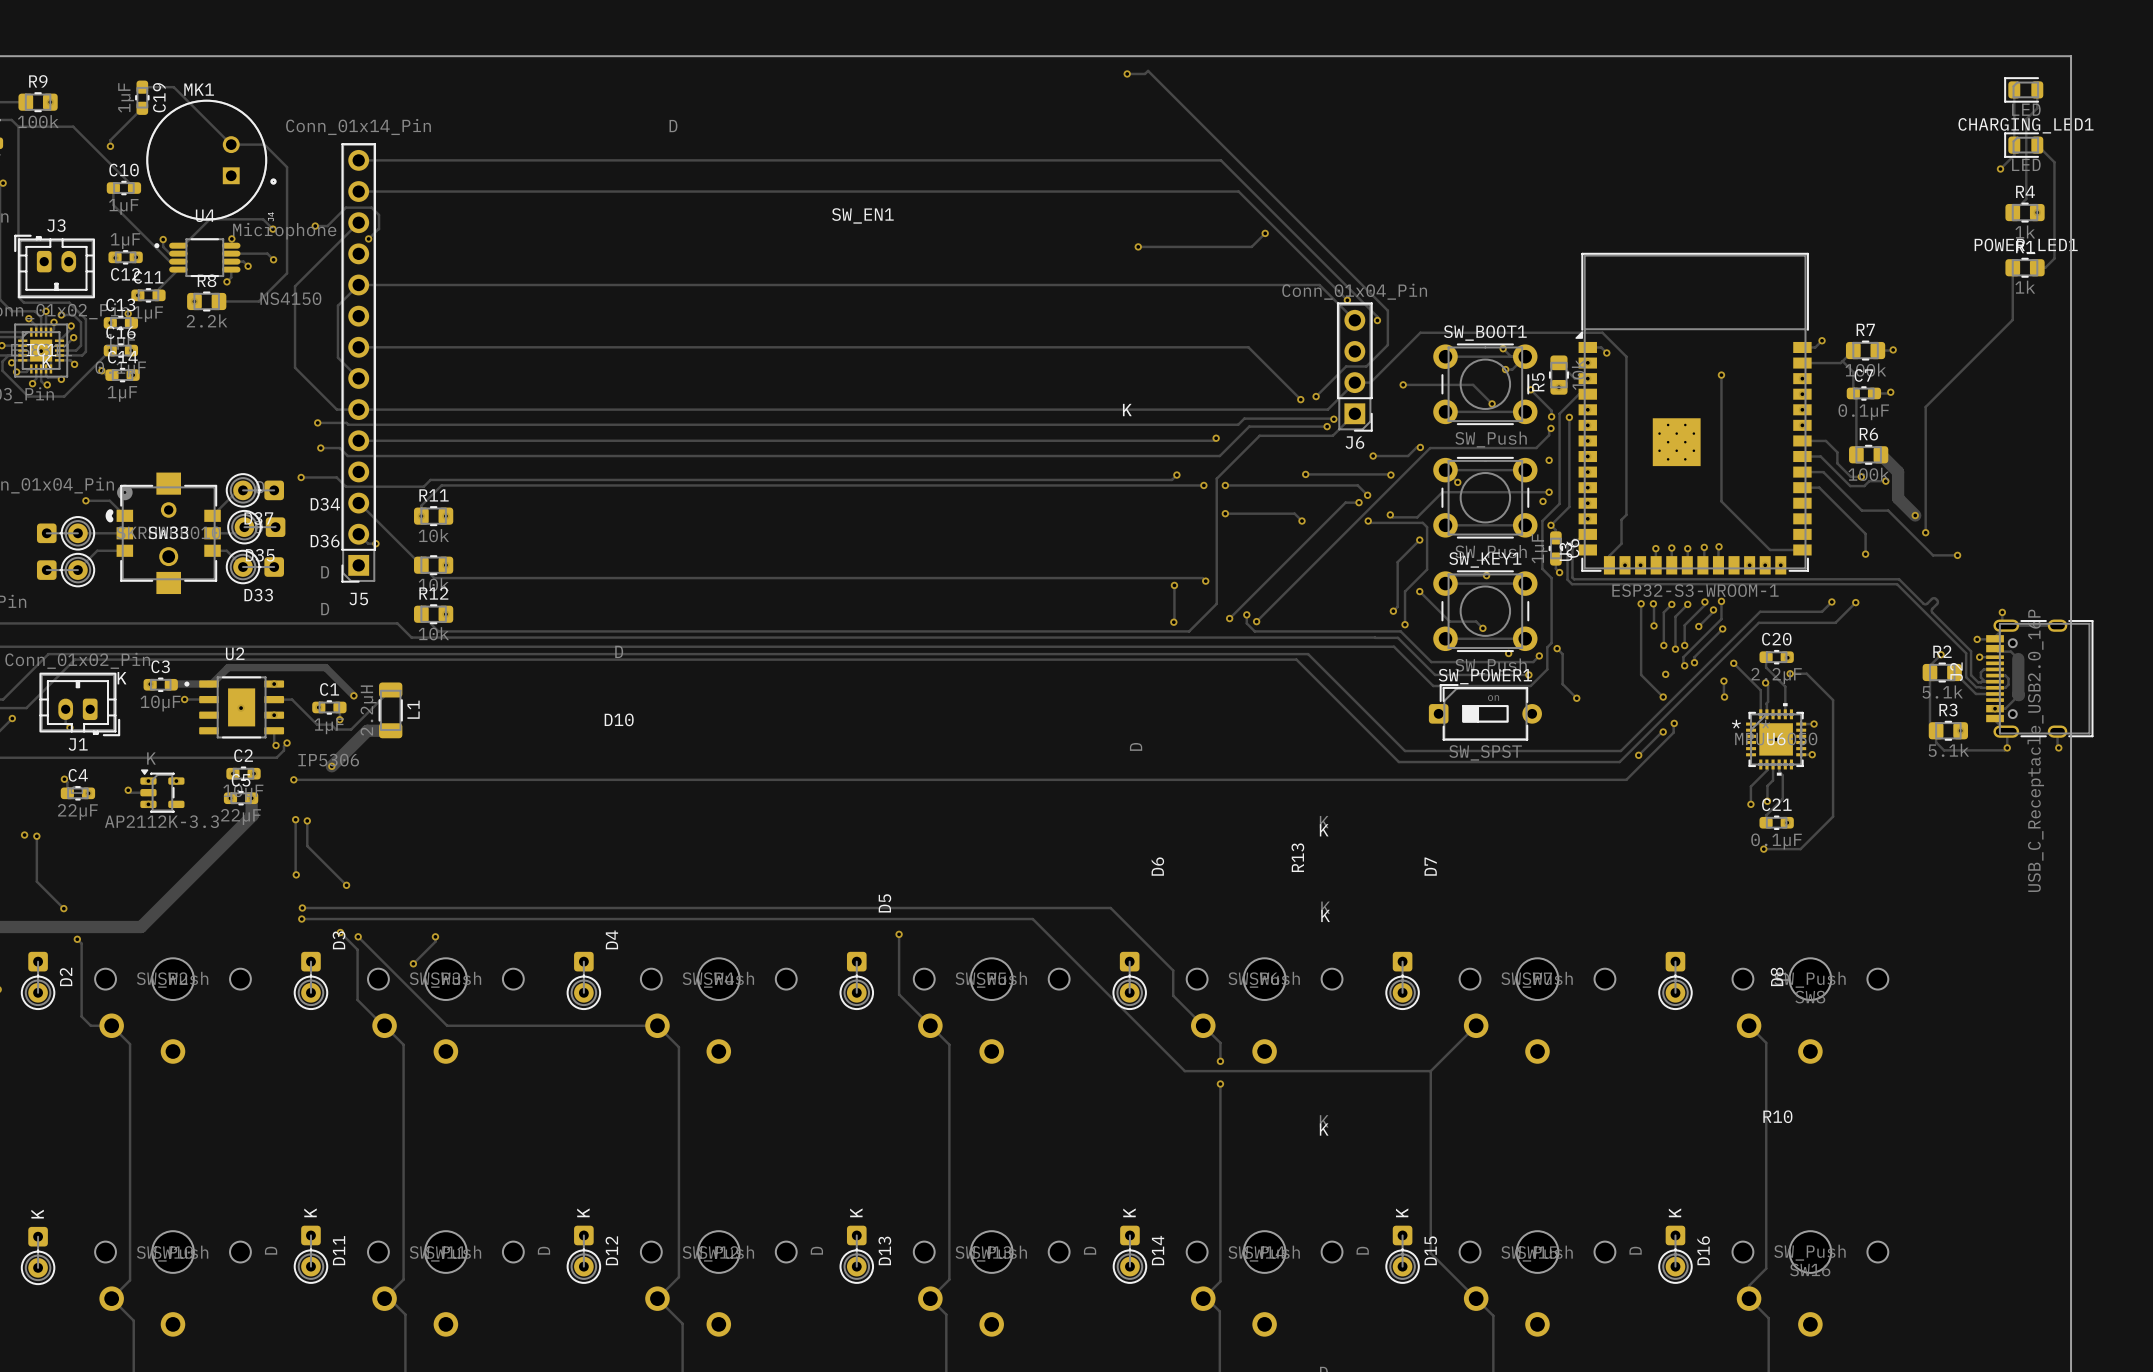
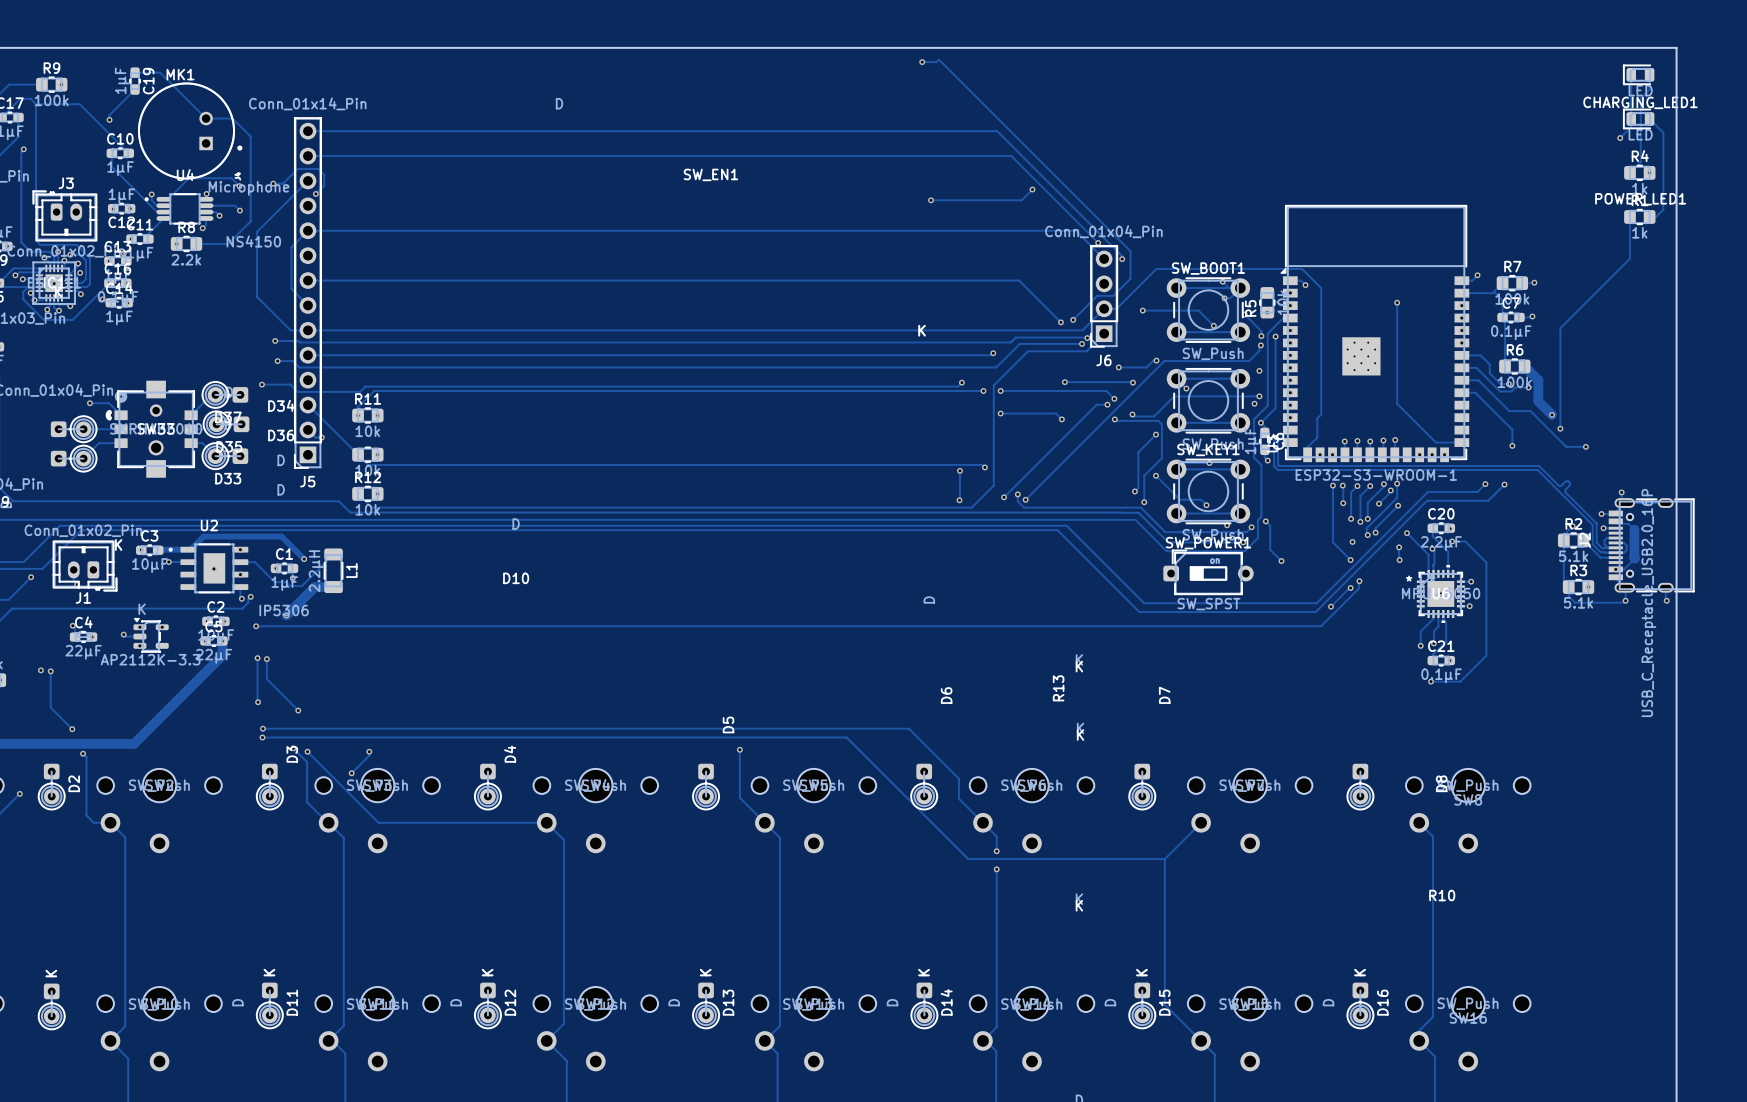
J6 footprint: [1337, 302, 1373, 432] -> [1090, 245, 1118, 348]

